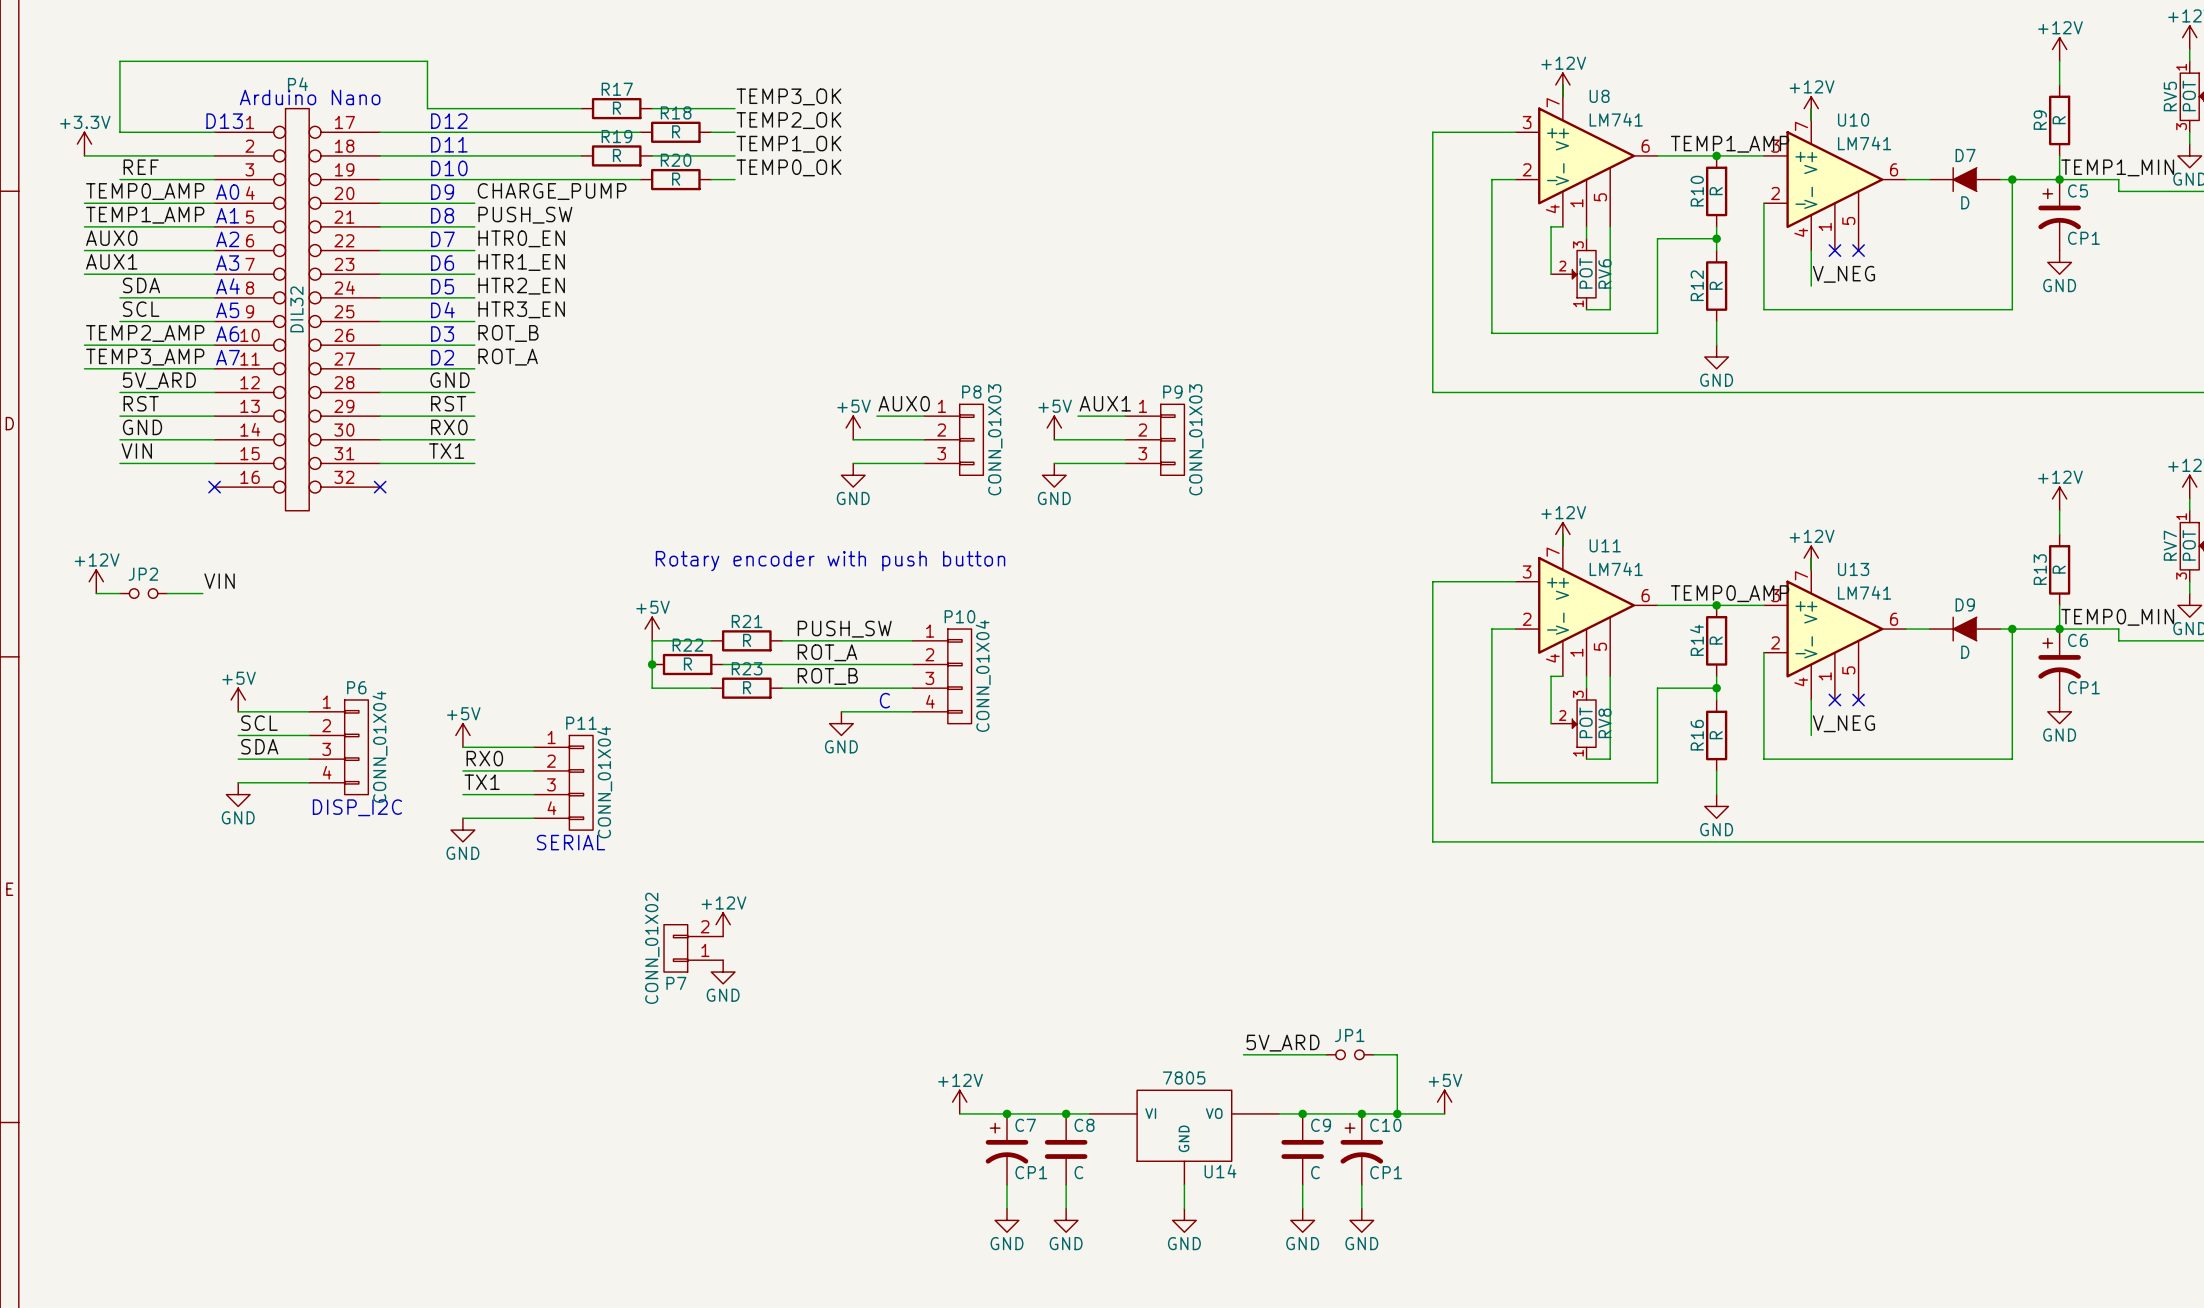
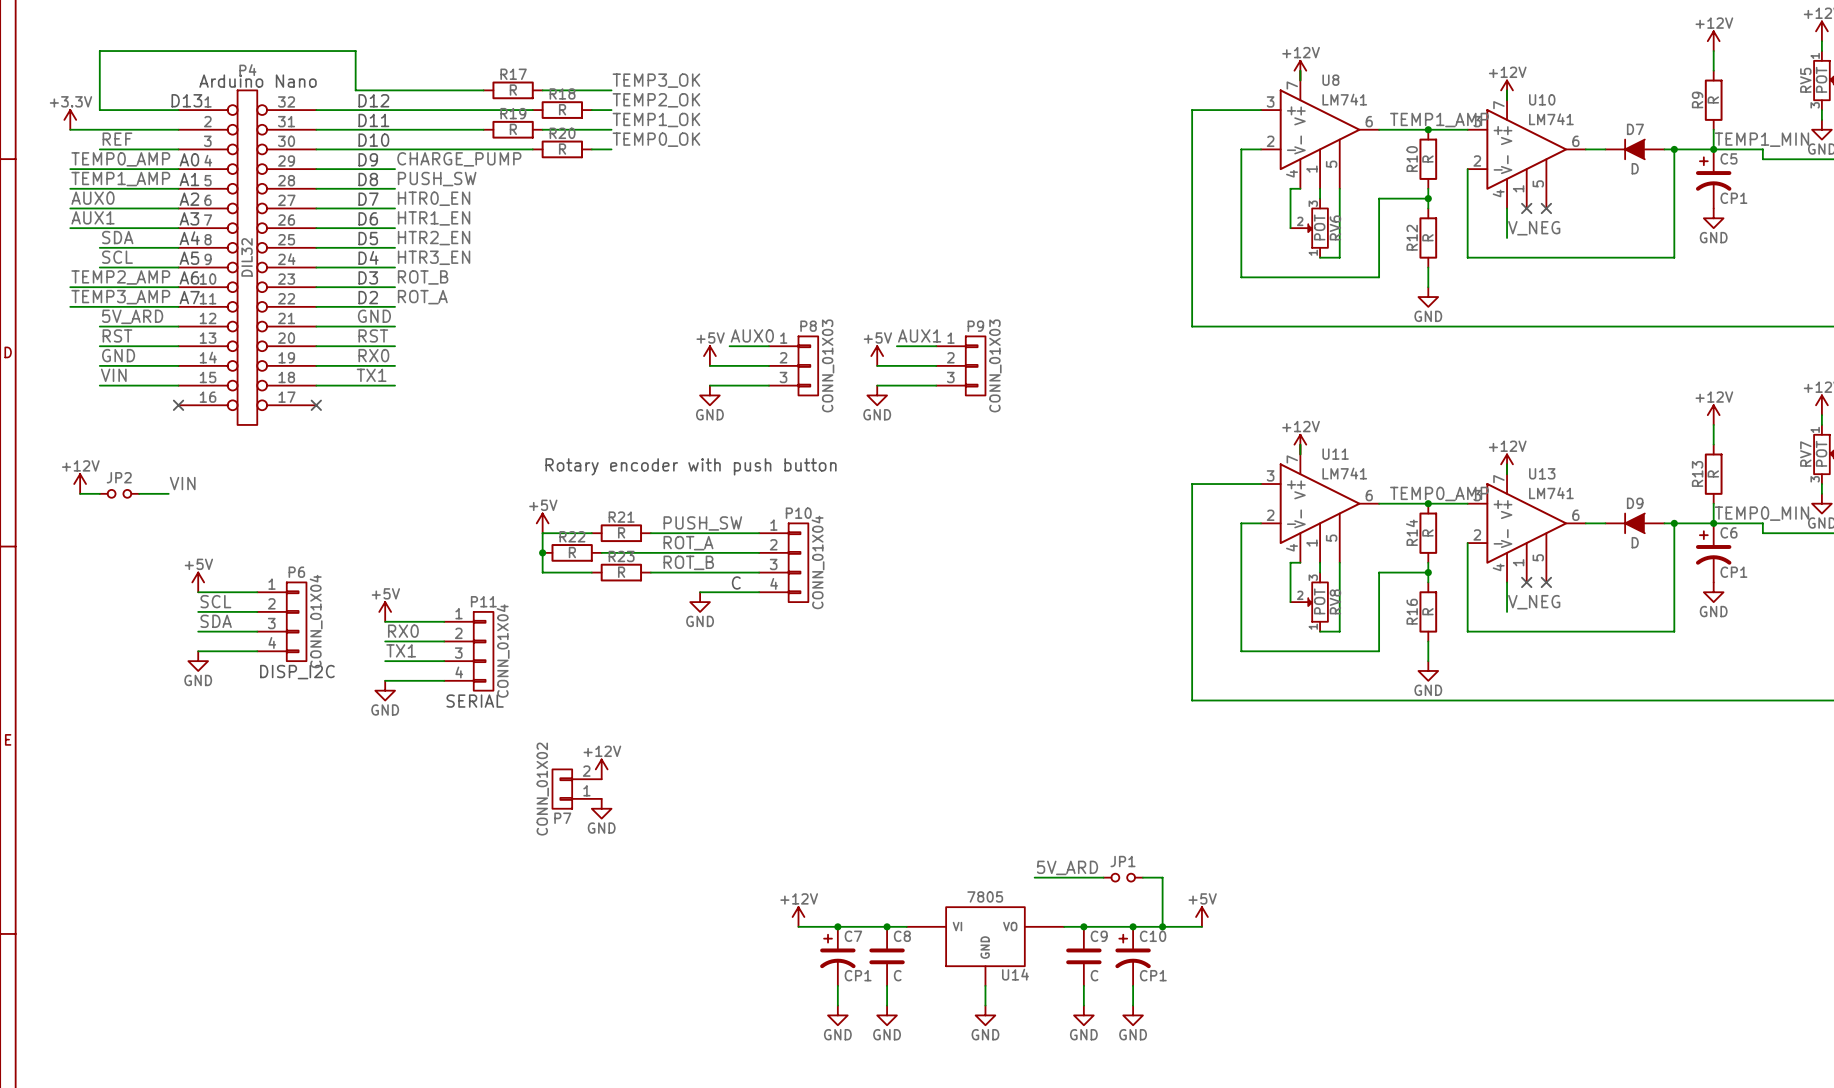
P4 symbol: [214, 108, 381, 511] -> [178, 90, 317, 425]

